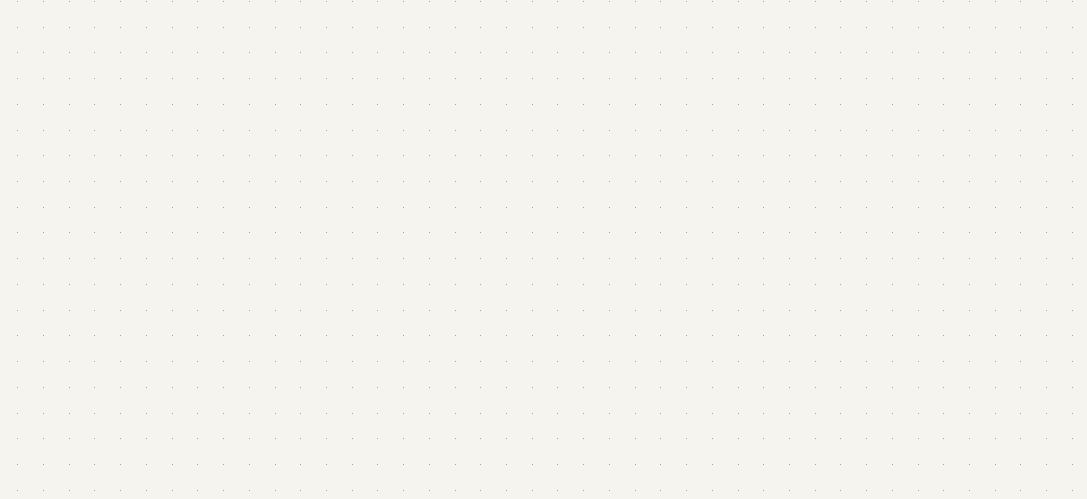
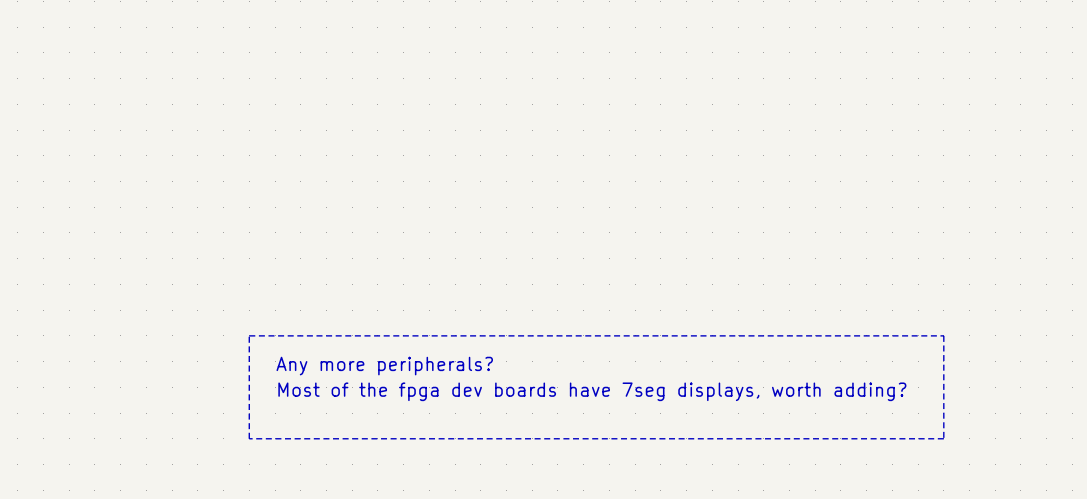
line: none -> (249, 335) (943, 335) (943, 438) (249, 438) (249, 335)
text: none -> Any more peripherals? (384, 366)
text: none -> Most of the fpga dev boards have 7seg displays, worth adding? (592, 391)

